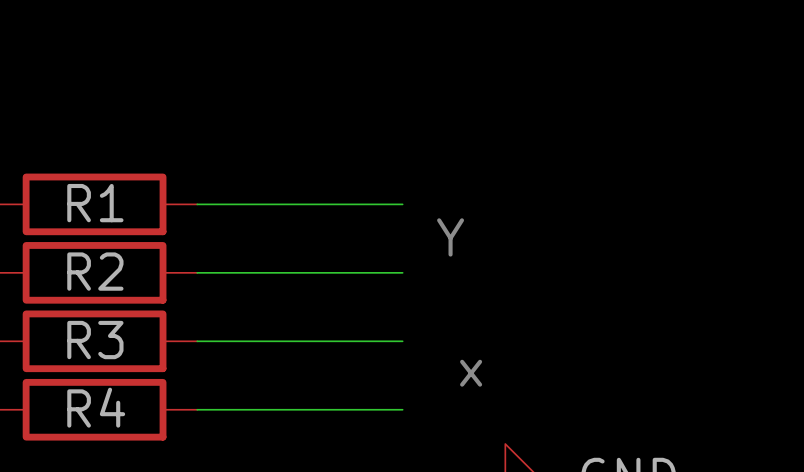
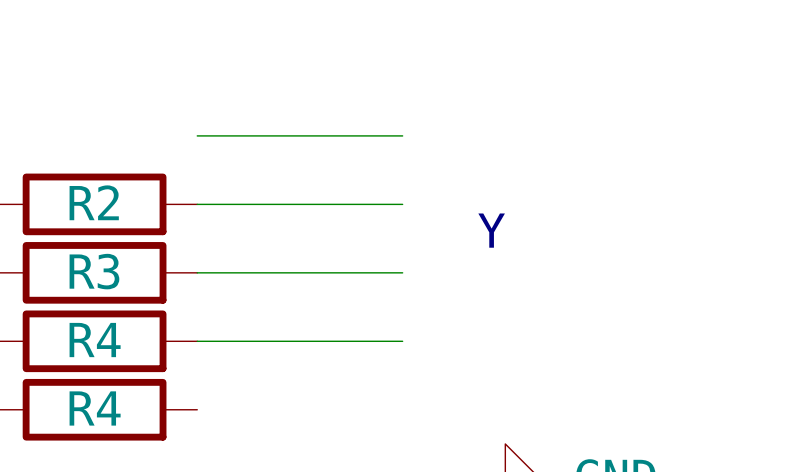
R1 name: R1 (95, 203) -> R2 (94, 202)
text position: Y (450, 237) -> Y (491, 230)
R2 name: R2 (95, 271) -> R3 (94, 271)
R3 name: R3 (95, 340) -> R4 (95, 340)
text: x (471, 373) -> none
wire: (197, 409) (402, 409) -> (197, 135) (402, 135)

